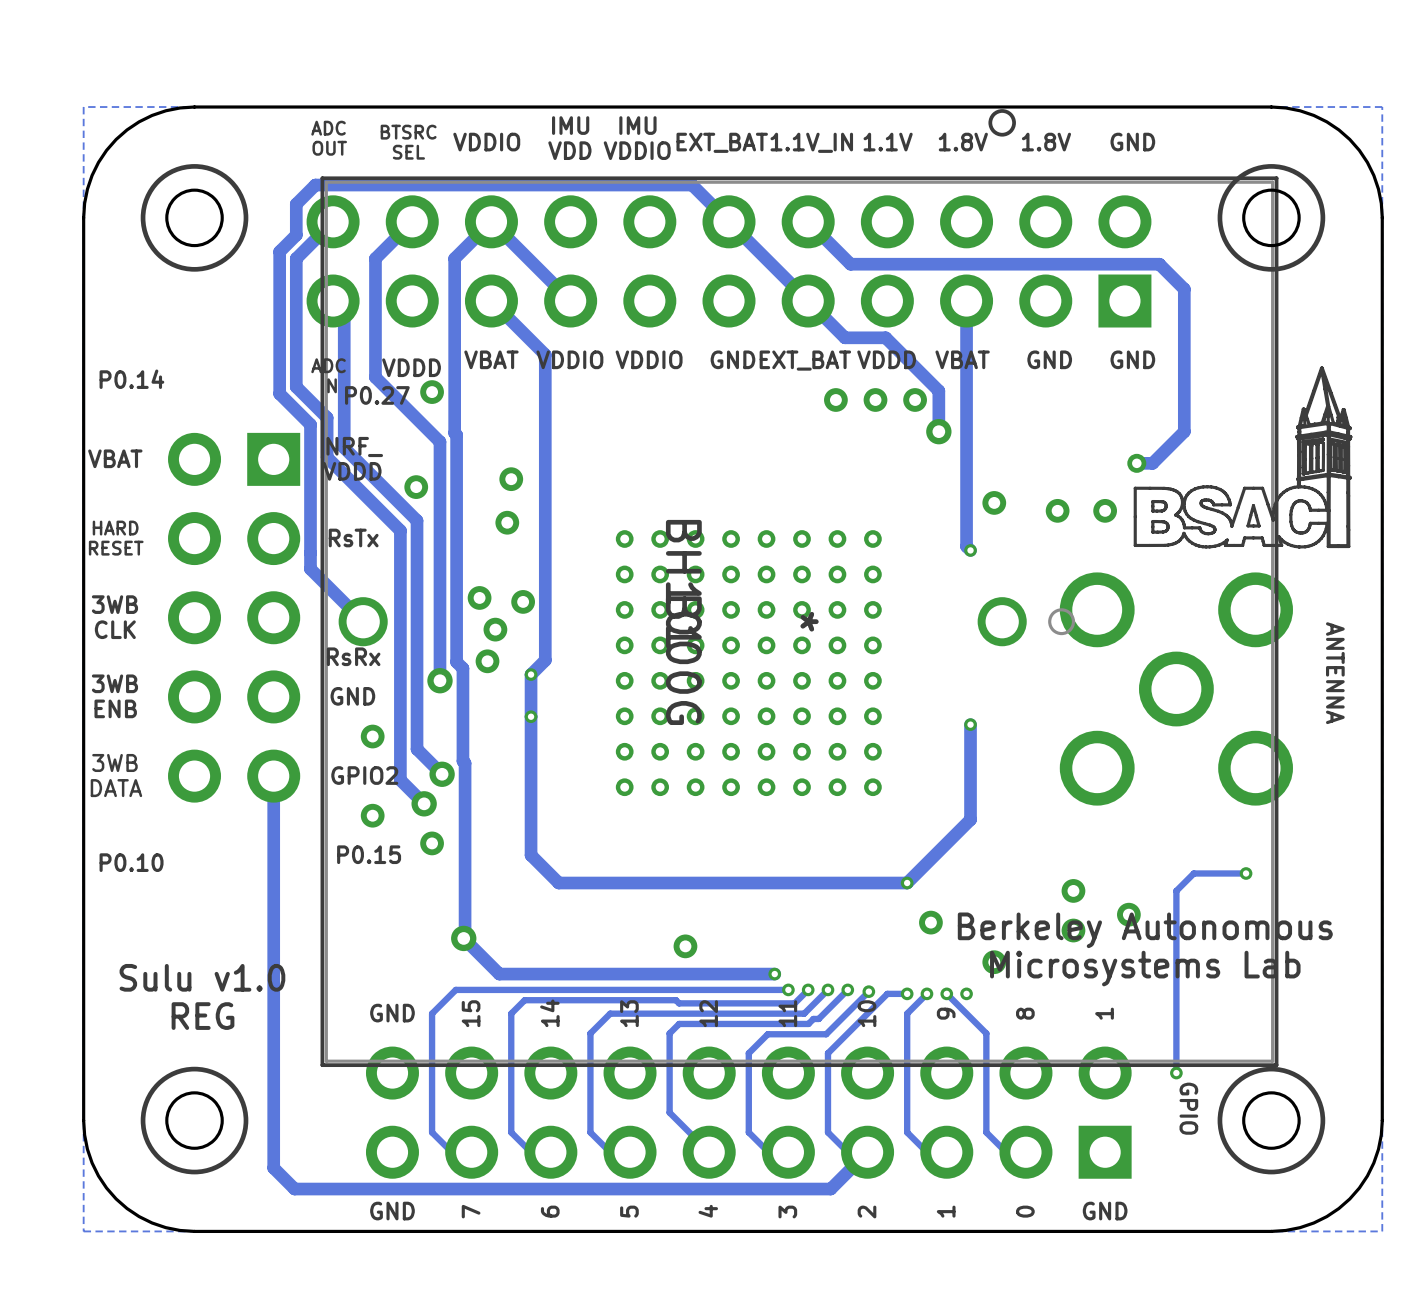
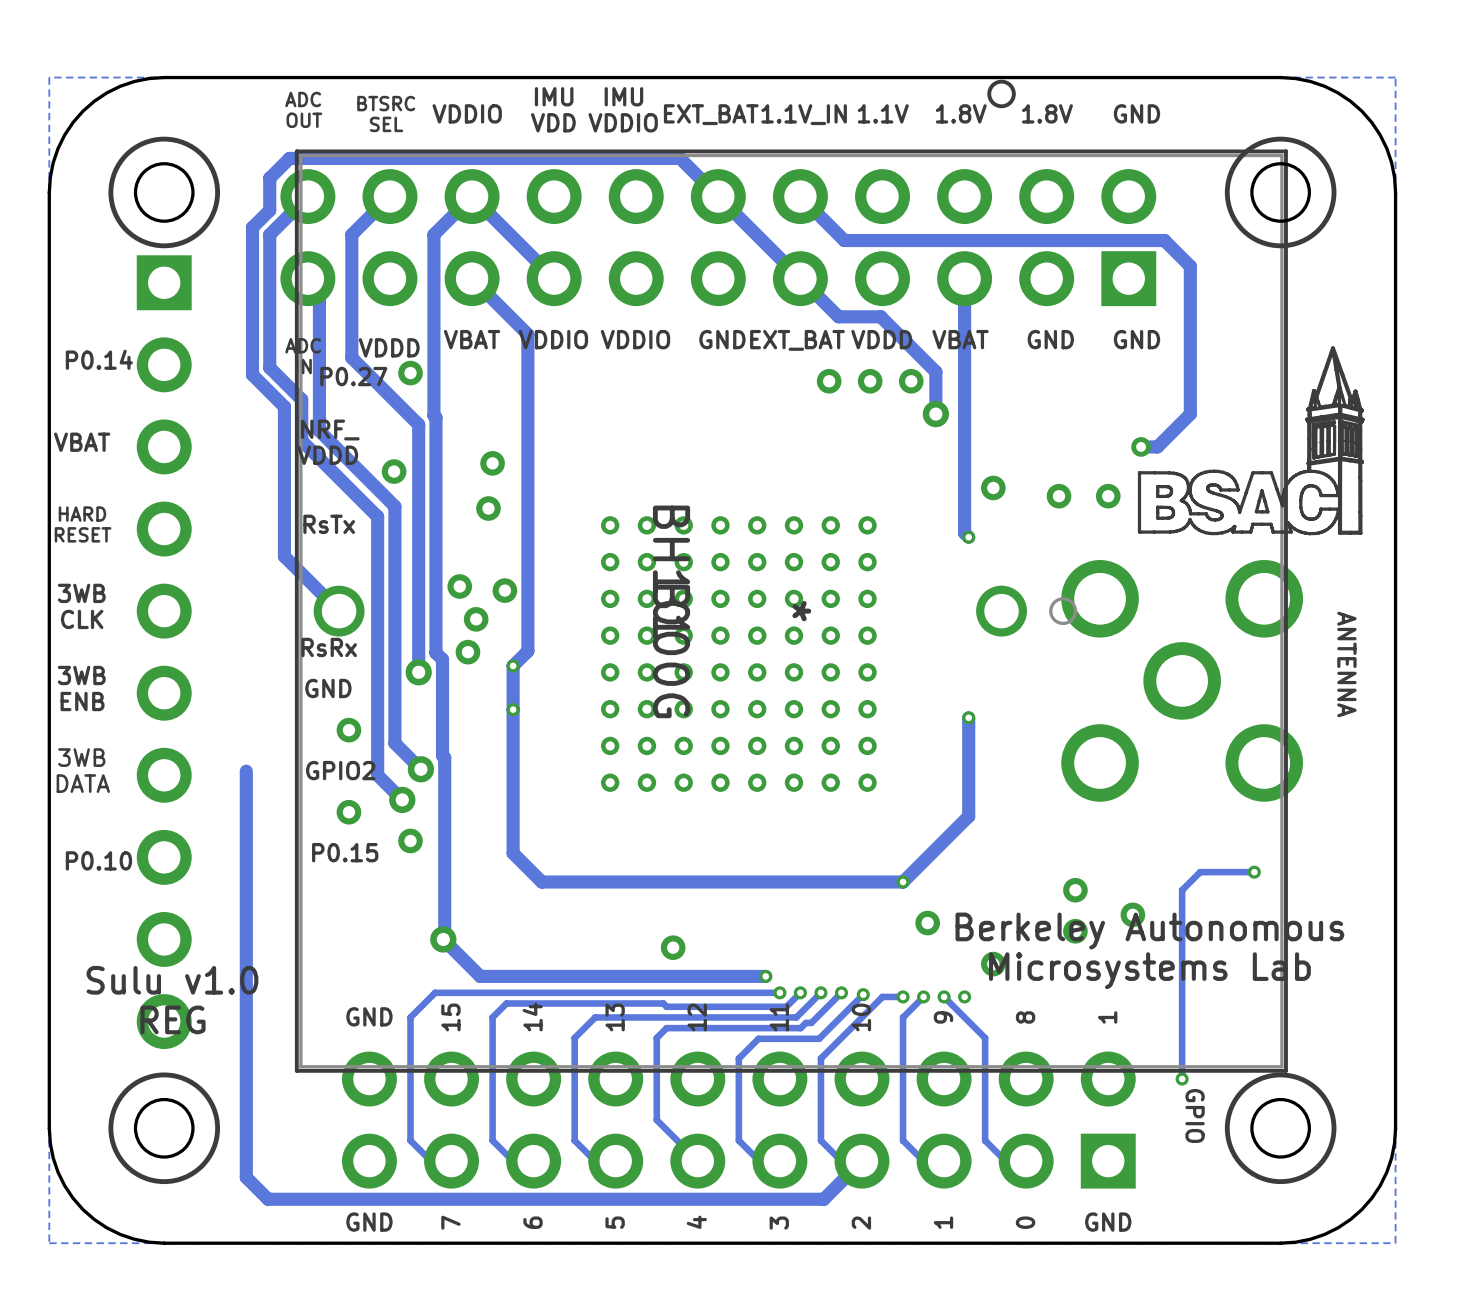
part: (234, 617) -> none
part: none -> (164, 652)

